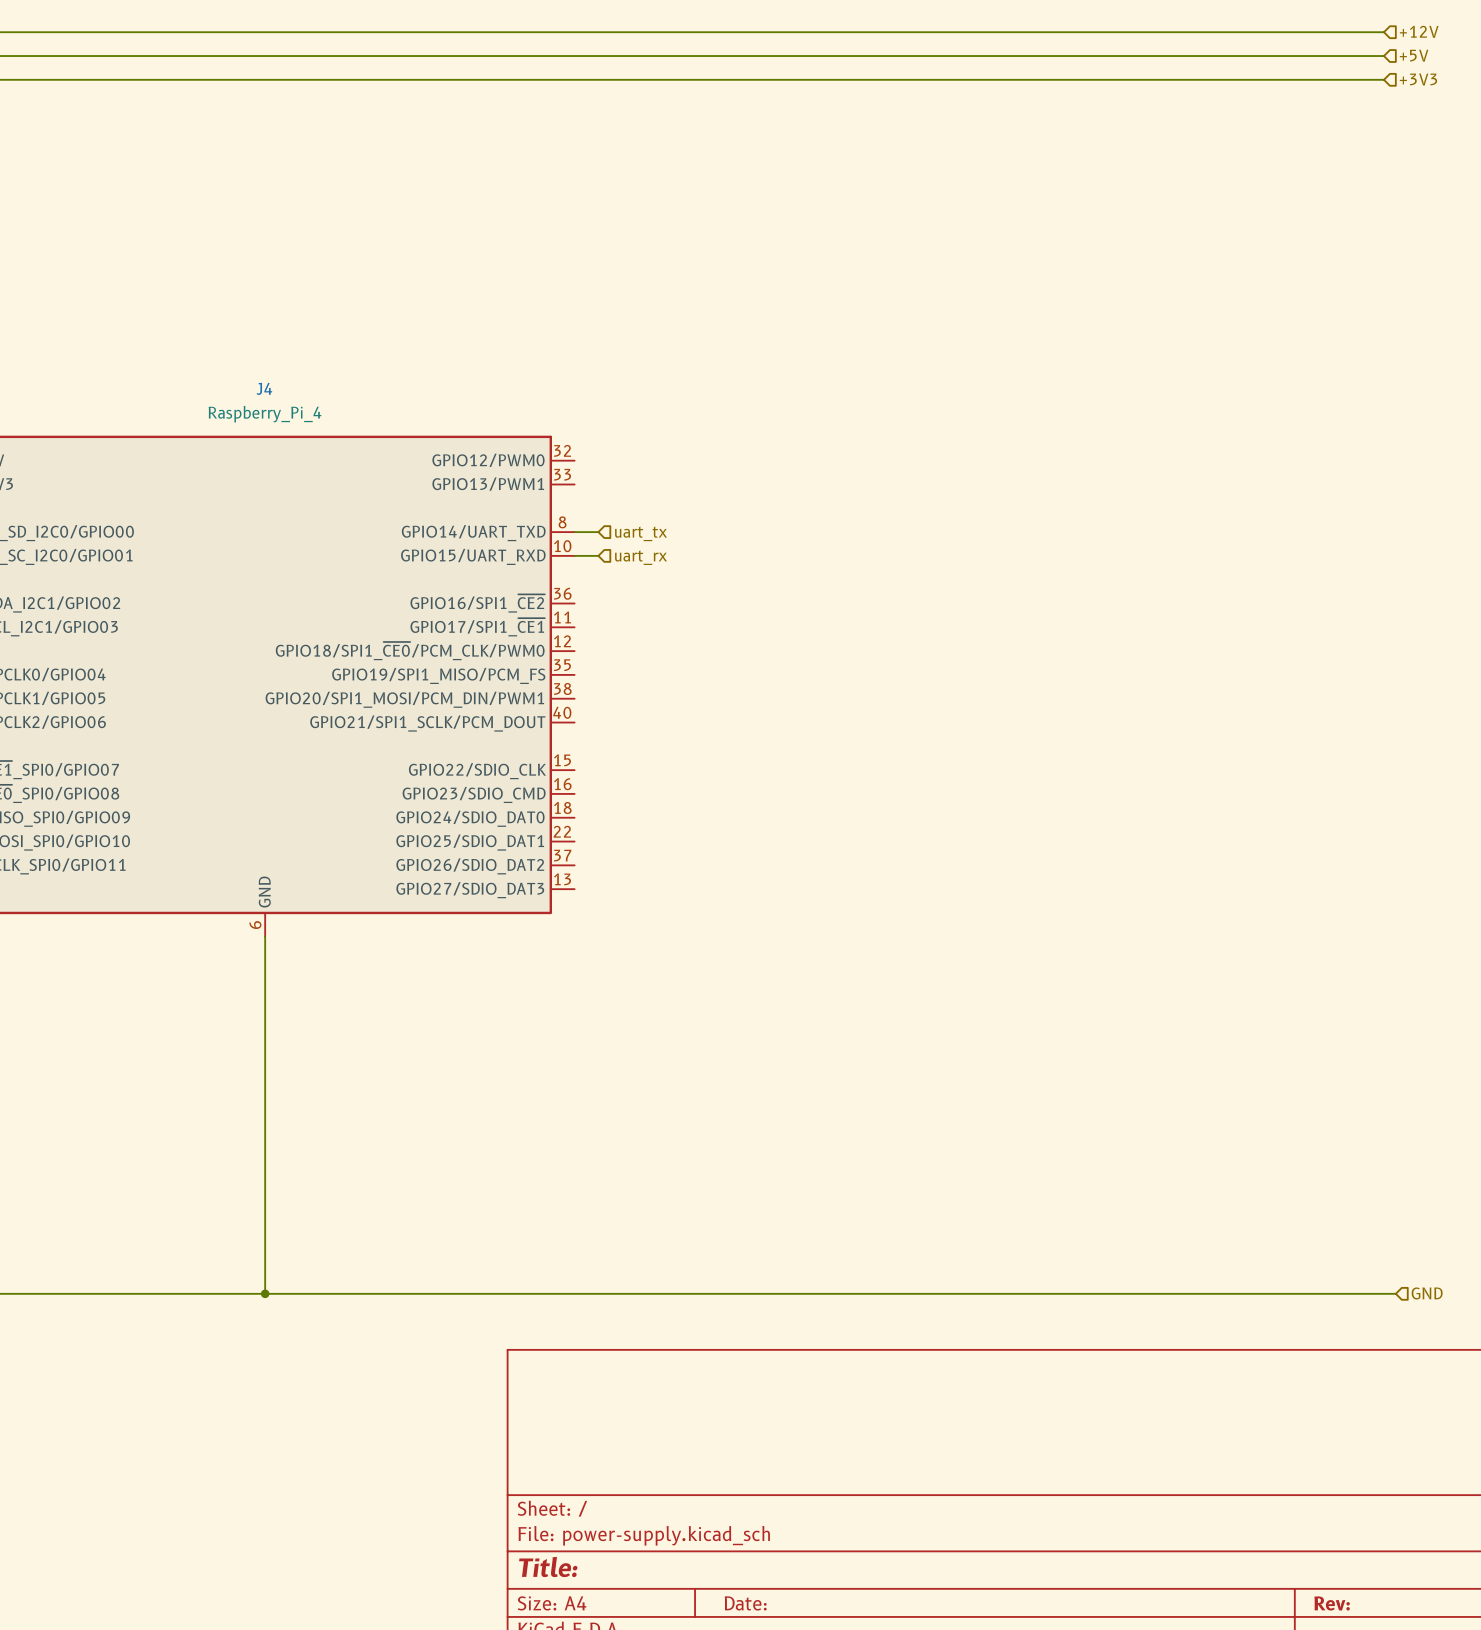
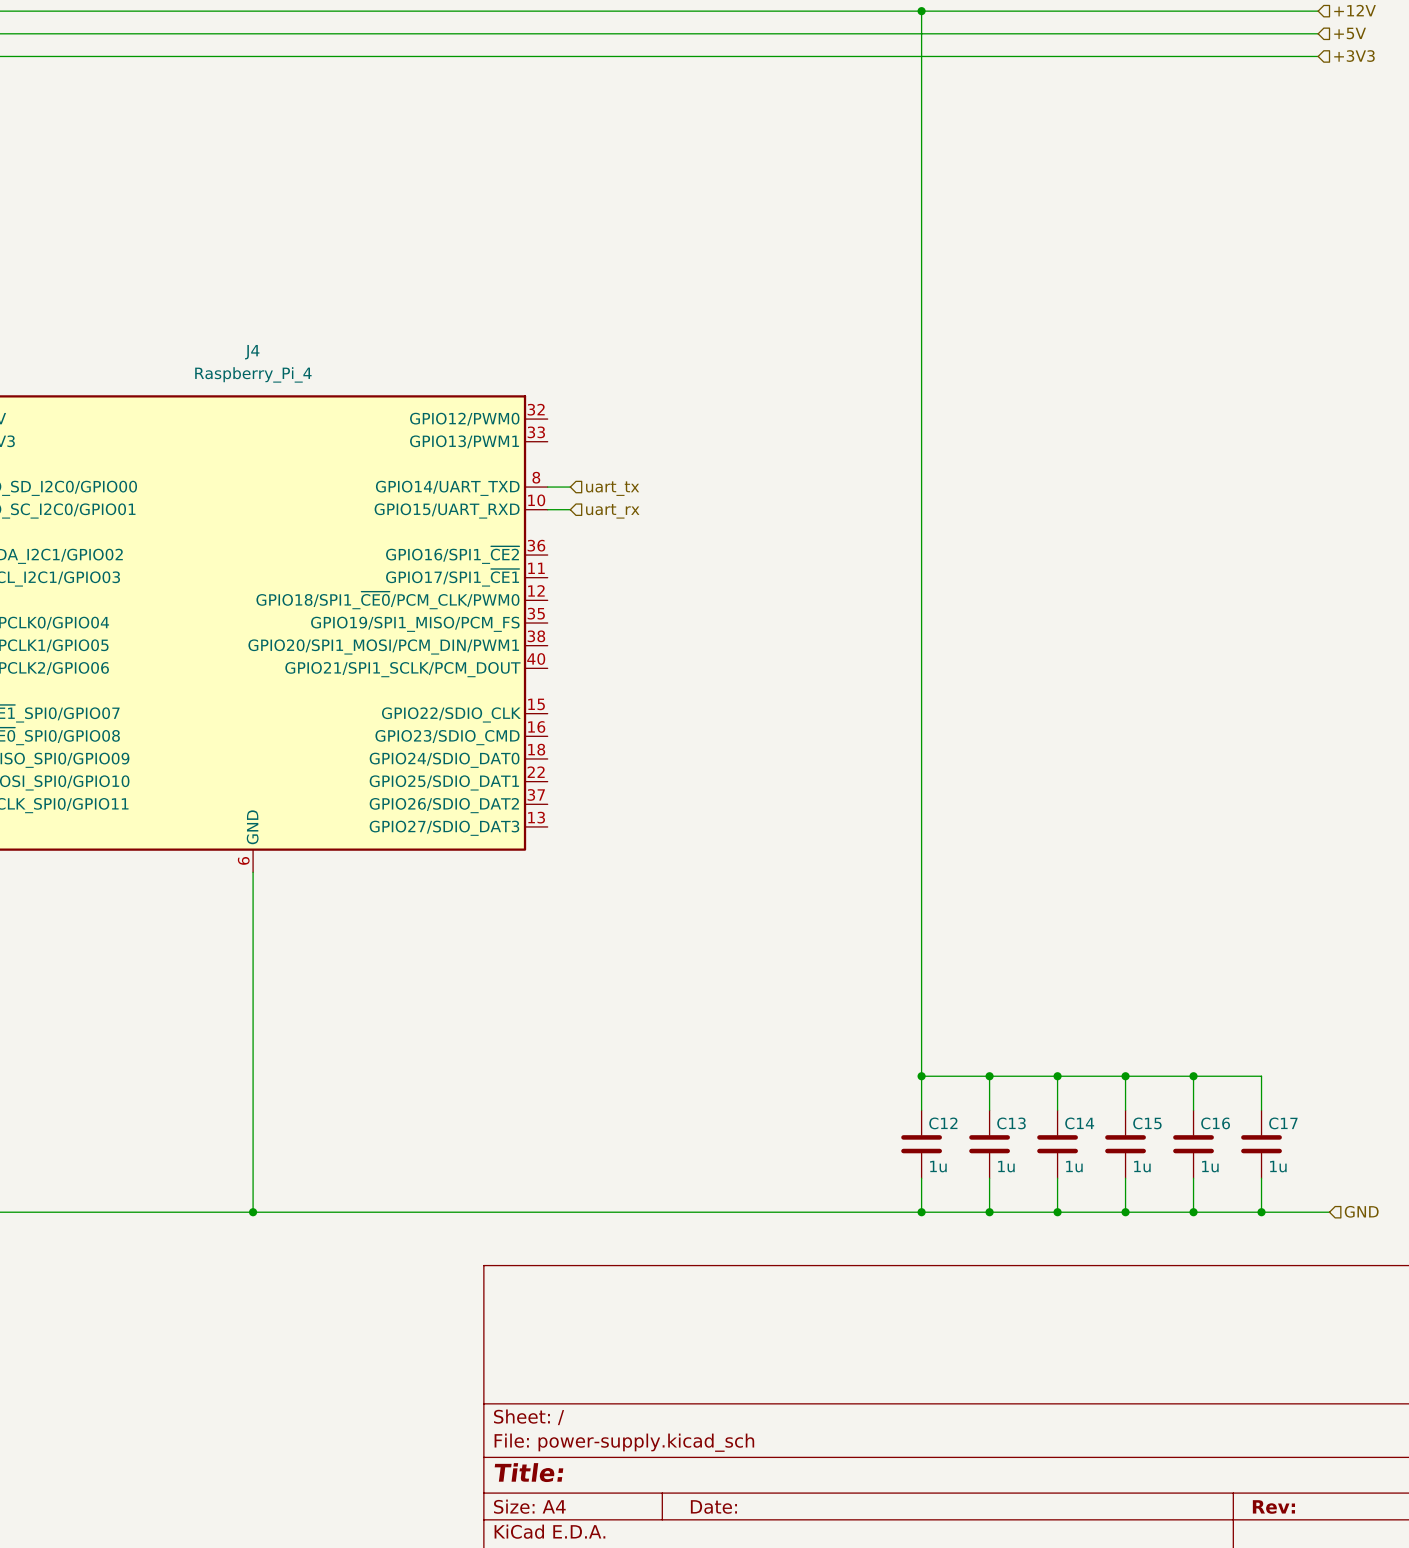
wire: none -> (921, 11) (921, 1110)
junction: none -> (921, 11)
wire: none -> (921, 1076) (1261, 1076) (1261, 1110)
junction: none -> (921, 1076)
wire: none -> (989, 1076) (989, 1110)
junction: none -> (989, 1076)
wire: none -> (1057, 1076) (1057, 1110)
junction: none -> (1057, 1076)
wire: none -> (1125, 1076) (1125, 1110)
junction: none -> (1125, 1076)
wire: none -> (1193, 1076) (1193, 1110)
junction: none -> (1193, 1076)
C12: none -> 1u (921, 1144)
C13: none -> 1u (989, 1144)
C14: none -> 1u (1057, 1144)
C15: none -> 1u (1125, 1144)
C16: none -> 1u (1193, 1144)
C17: none -> 1u (1261, 1144)
wire: none -> (921, 1178) (921, 1212)
wire: none -> (989, 1178) (989, 1212)
wire: none -> (1057, 1178) (1057, 1212)
wire: none -> (1125, 1178) (1125, 1212)
wire: none -> (1193, 1178) (1193, 1212)
wire: none -> (1261, 1178) (1261, 1212)
junction: none -> (921, 1212)
junction: none -> (989, 1212)
junction: none -> (1057, 1212)
junction: none -> (1125, 1212)
junction: none -> (1193, 1212)
junction: none -> (1261, 1212)

